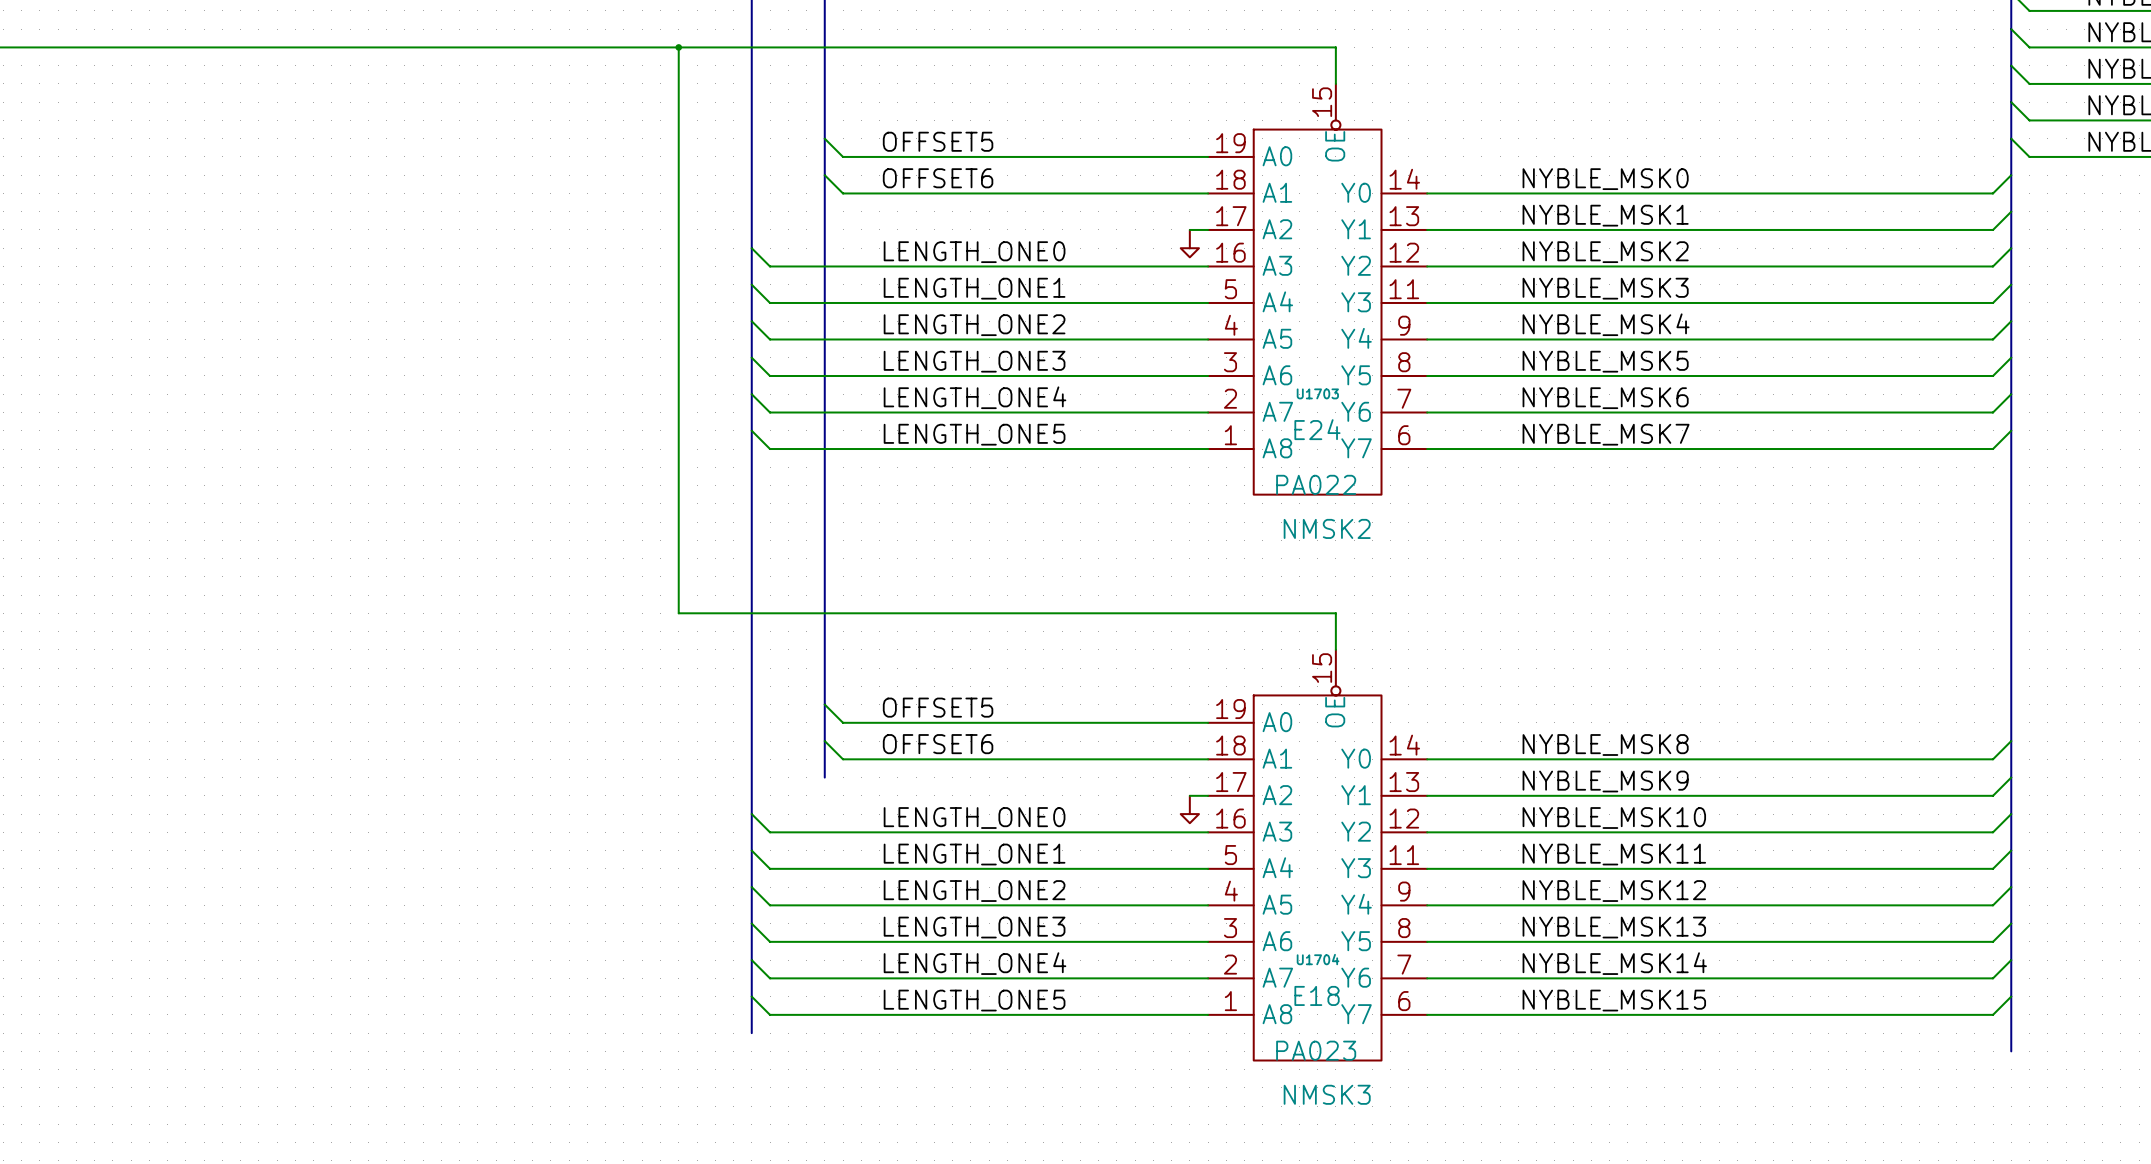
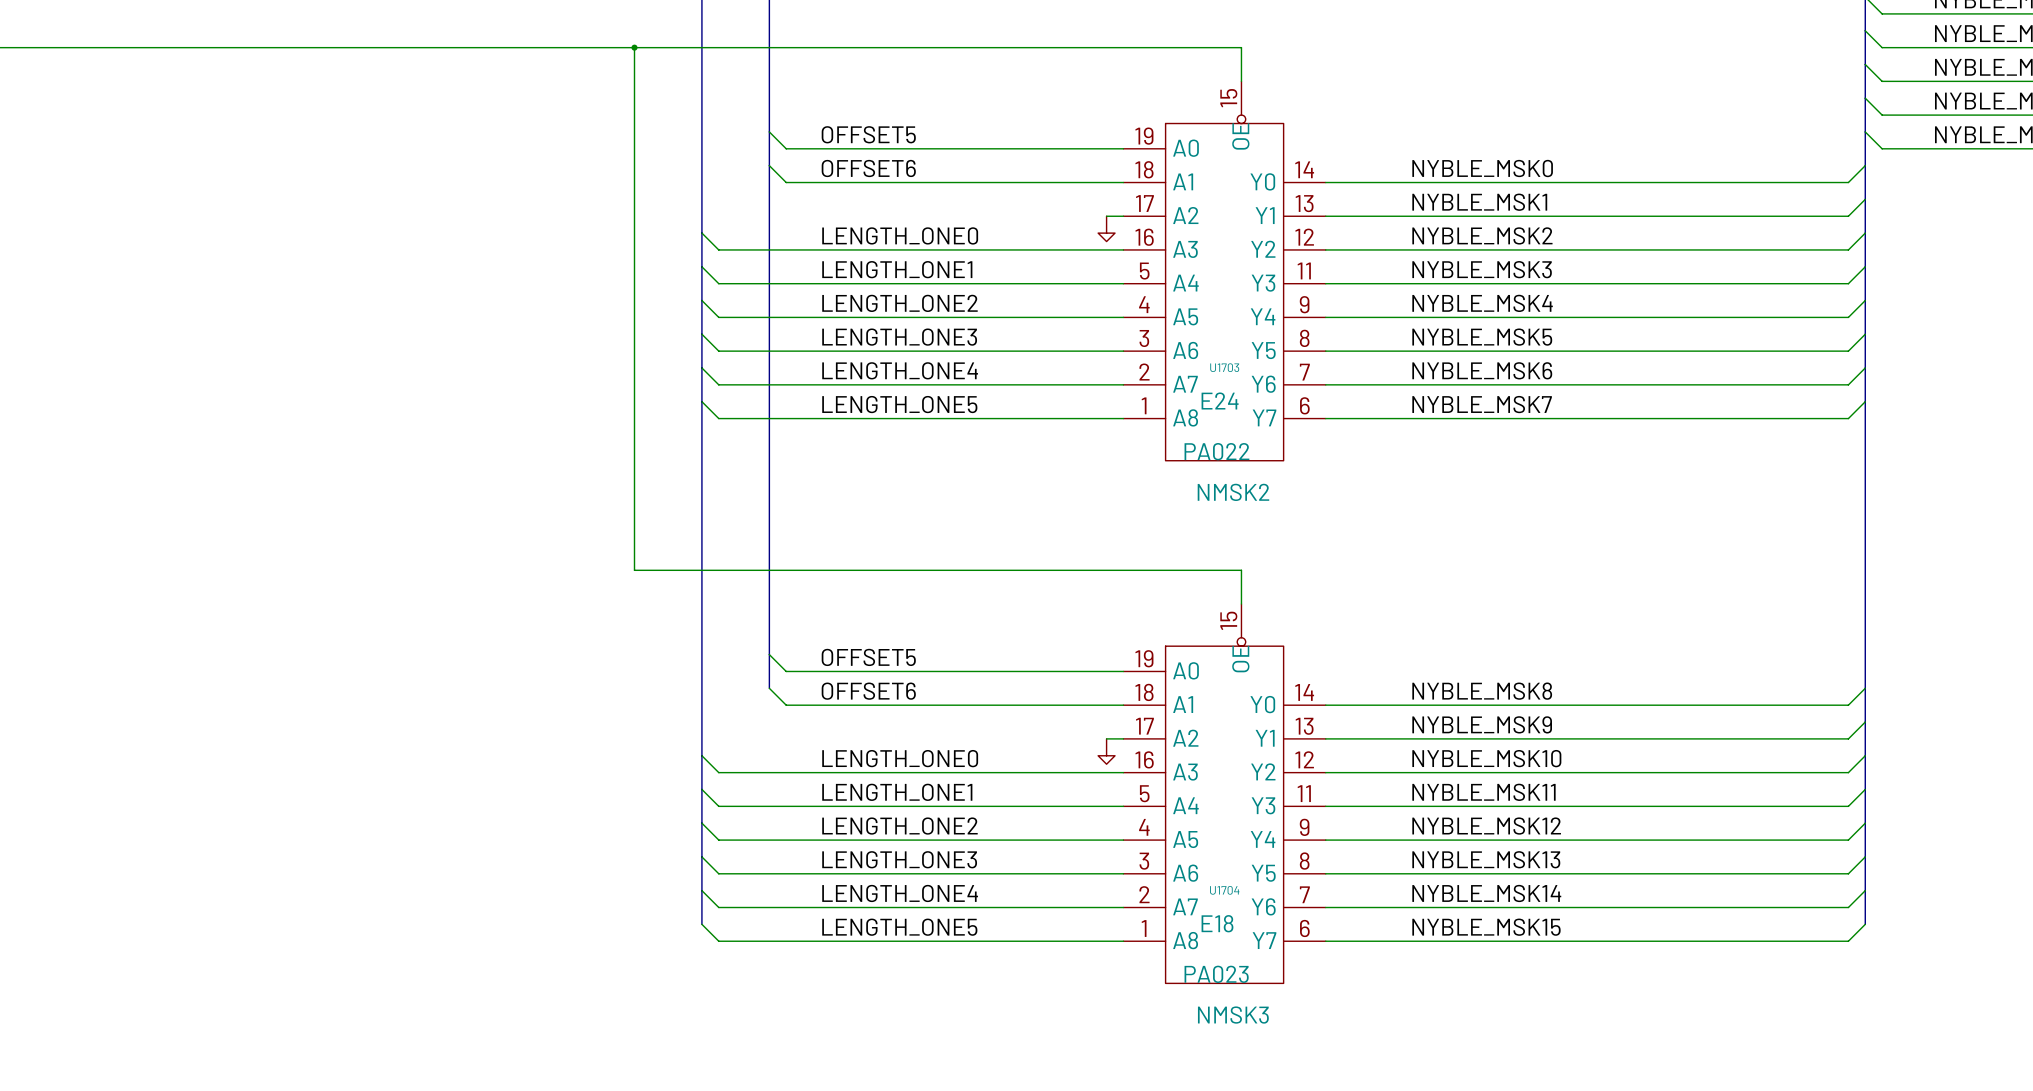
bus: (824, 741) (824, 777) -> none
bus: (751, 996) (751, 1033) -> none
bus: (2011, 996) (2011, 1051) -> none

